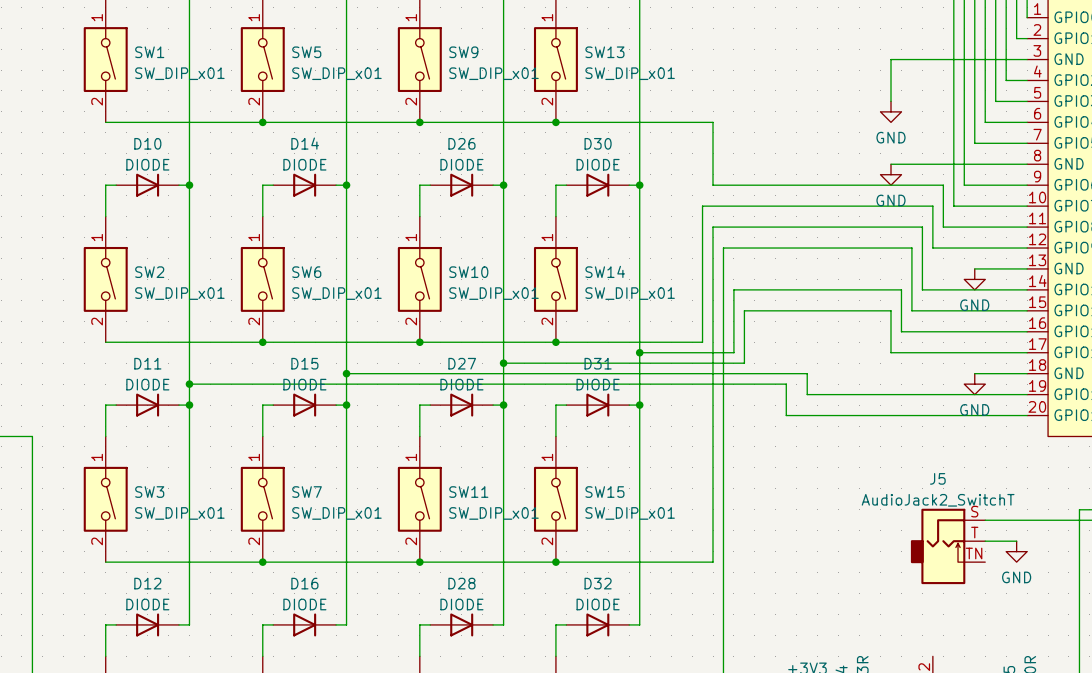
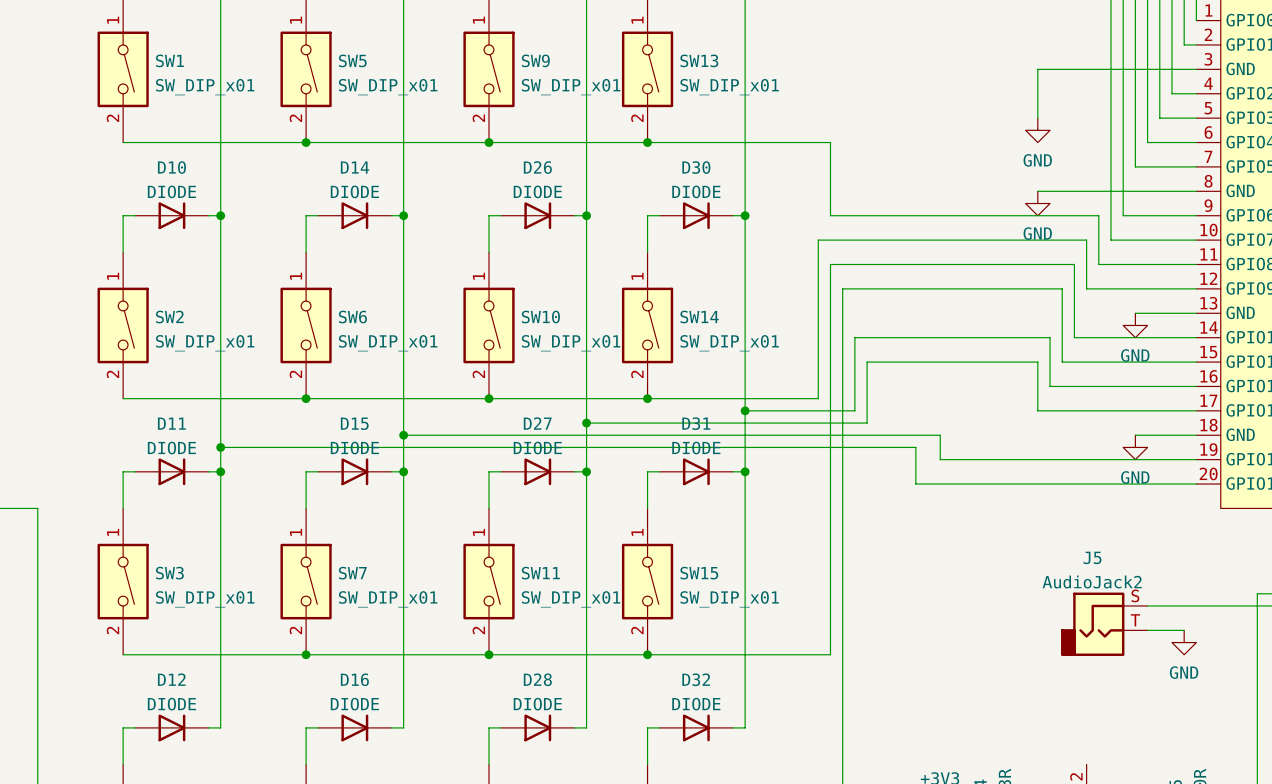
J5 value: AudioJack2_SwitchT (938, 500) -> AudioJack2 (1092, 582)
J5 symbol: [910, 508, 986, 585] -> [1060, 592, 1148, 656]

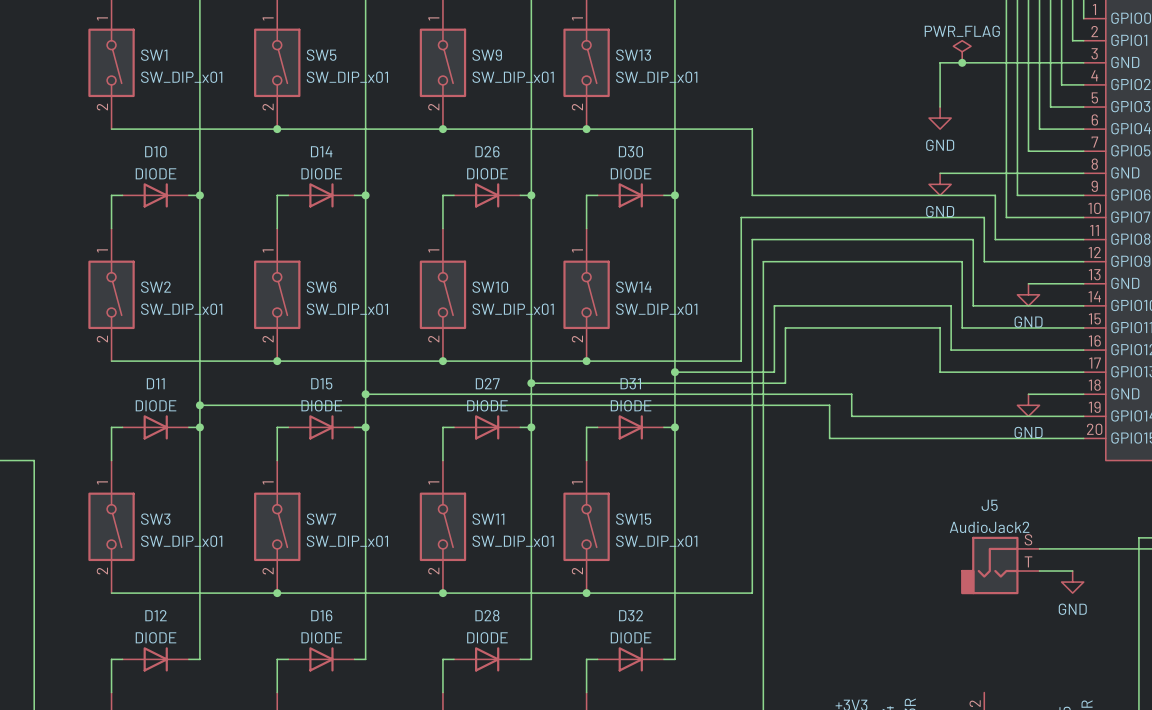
power symbol: none -> PWR_FLAG (962, 51)
junction: none -> (962, 62)

